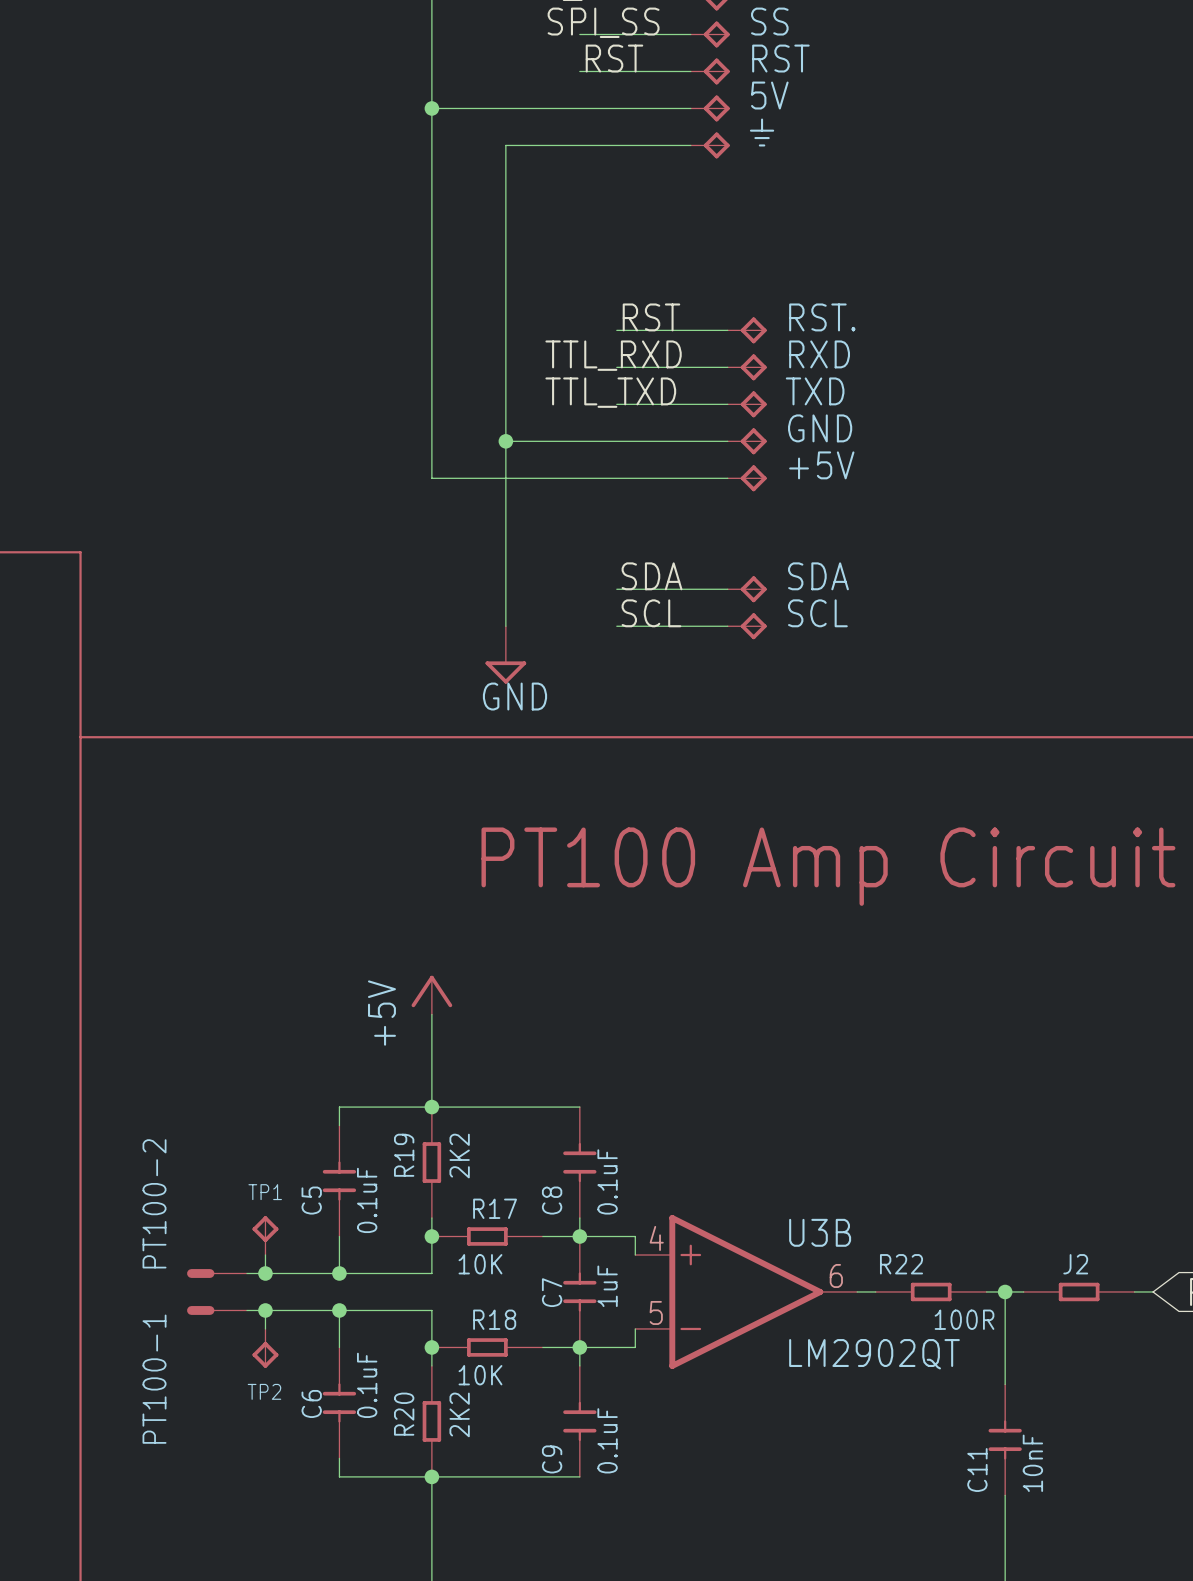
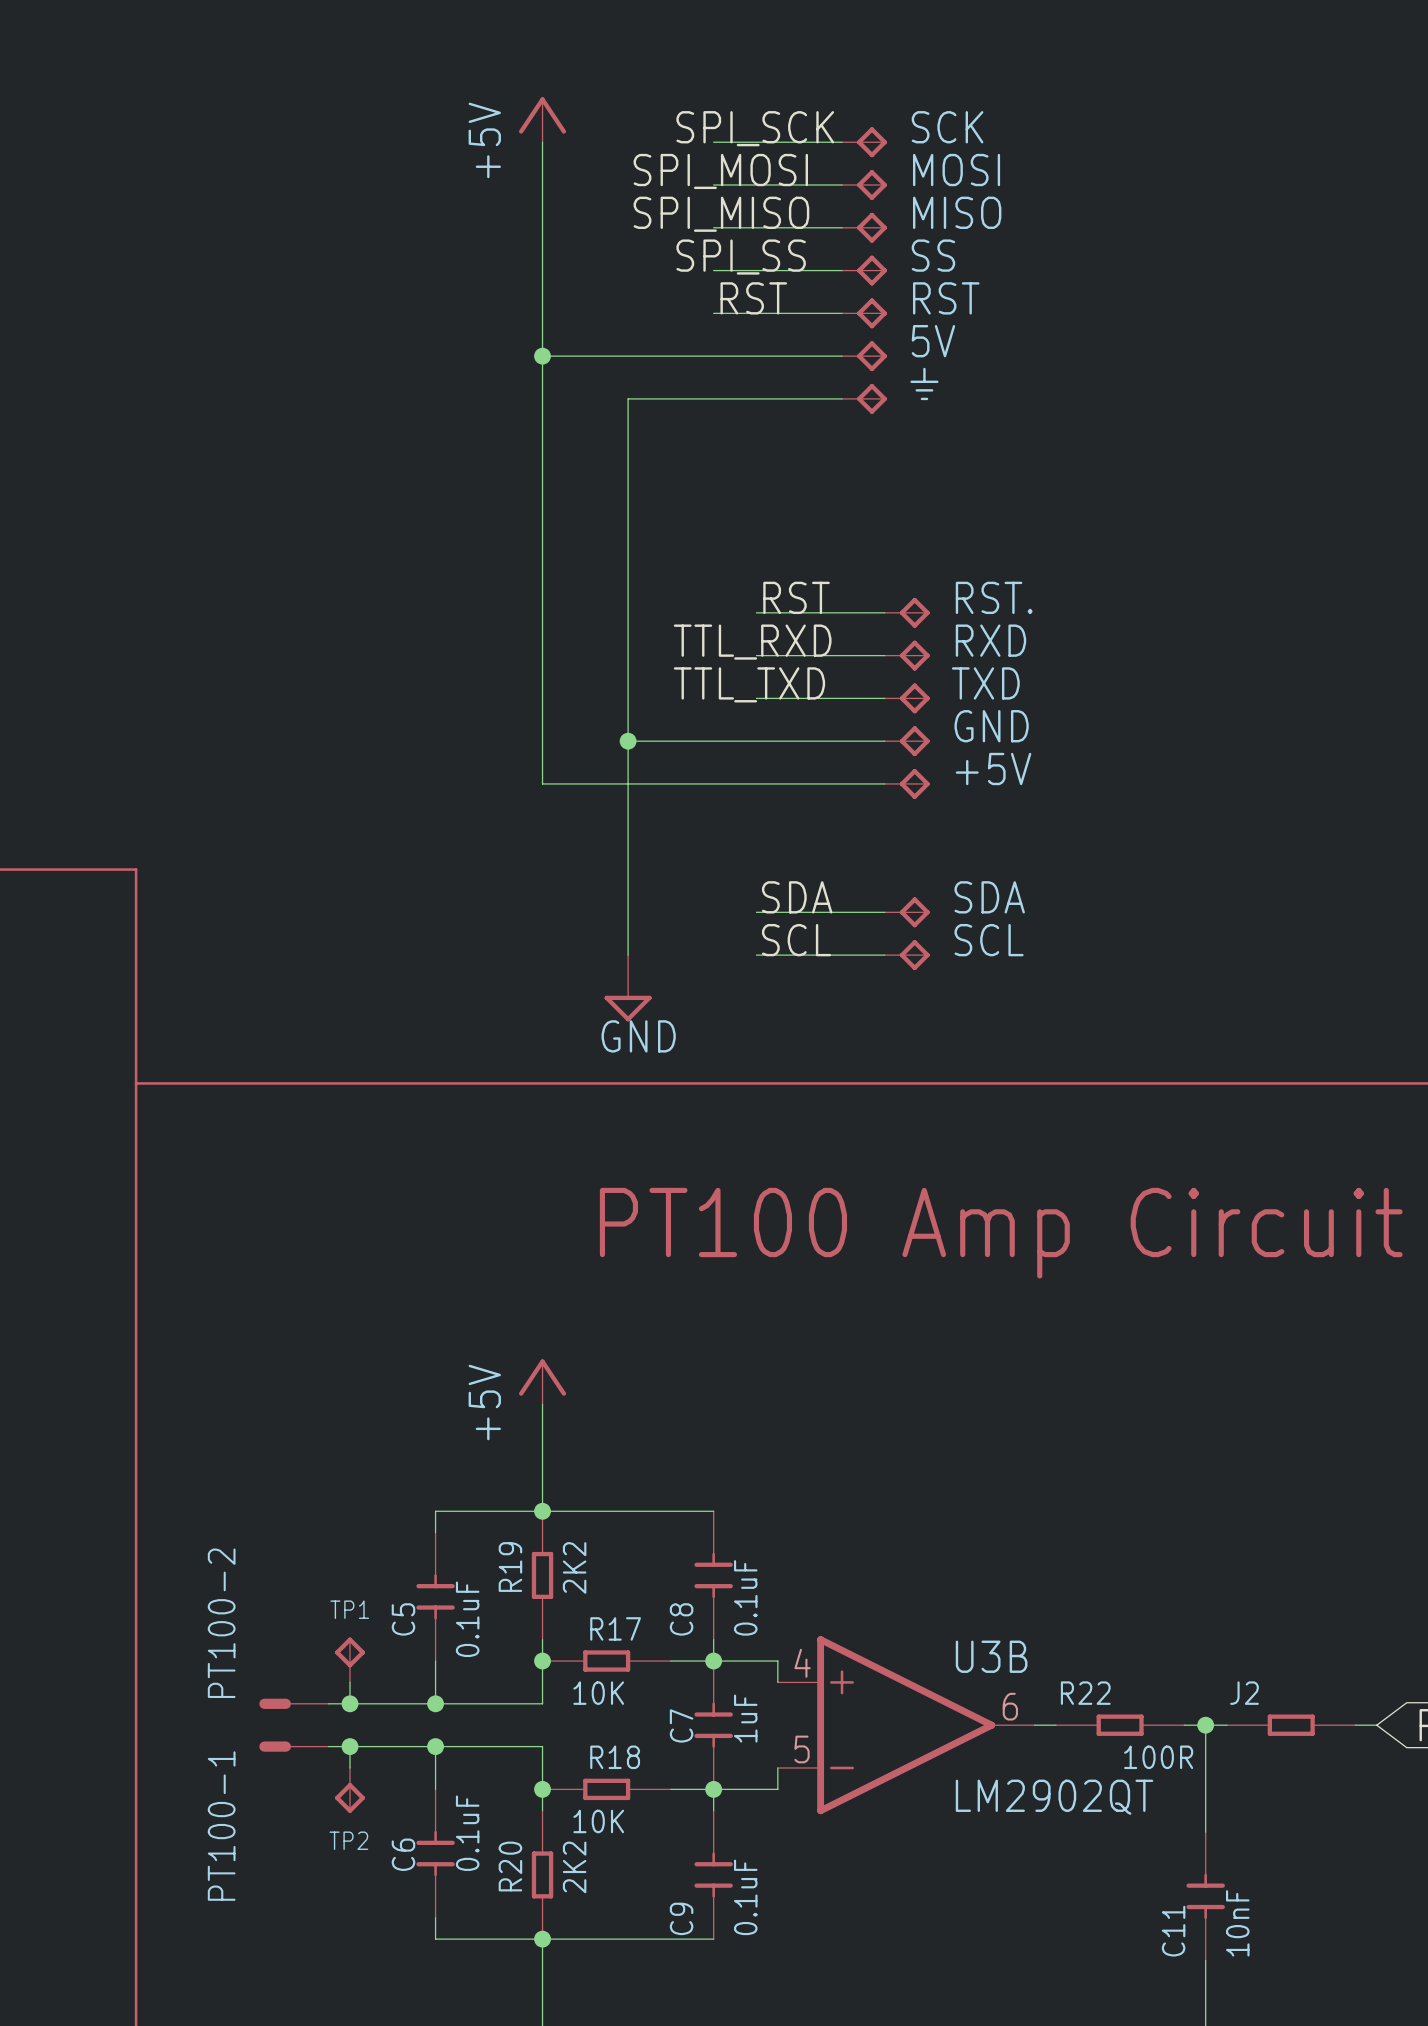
J2 name position: J2 (1075, 1264) -> J2 (1244, 1693)

